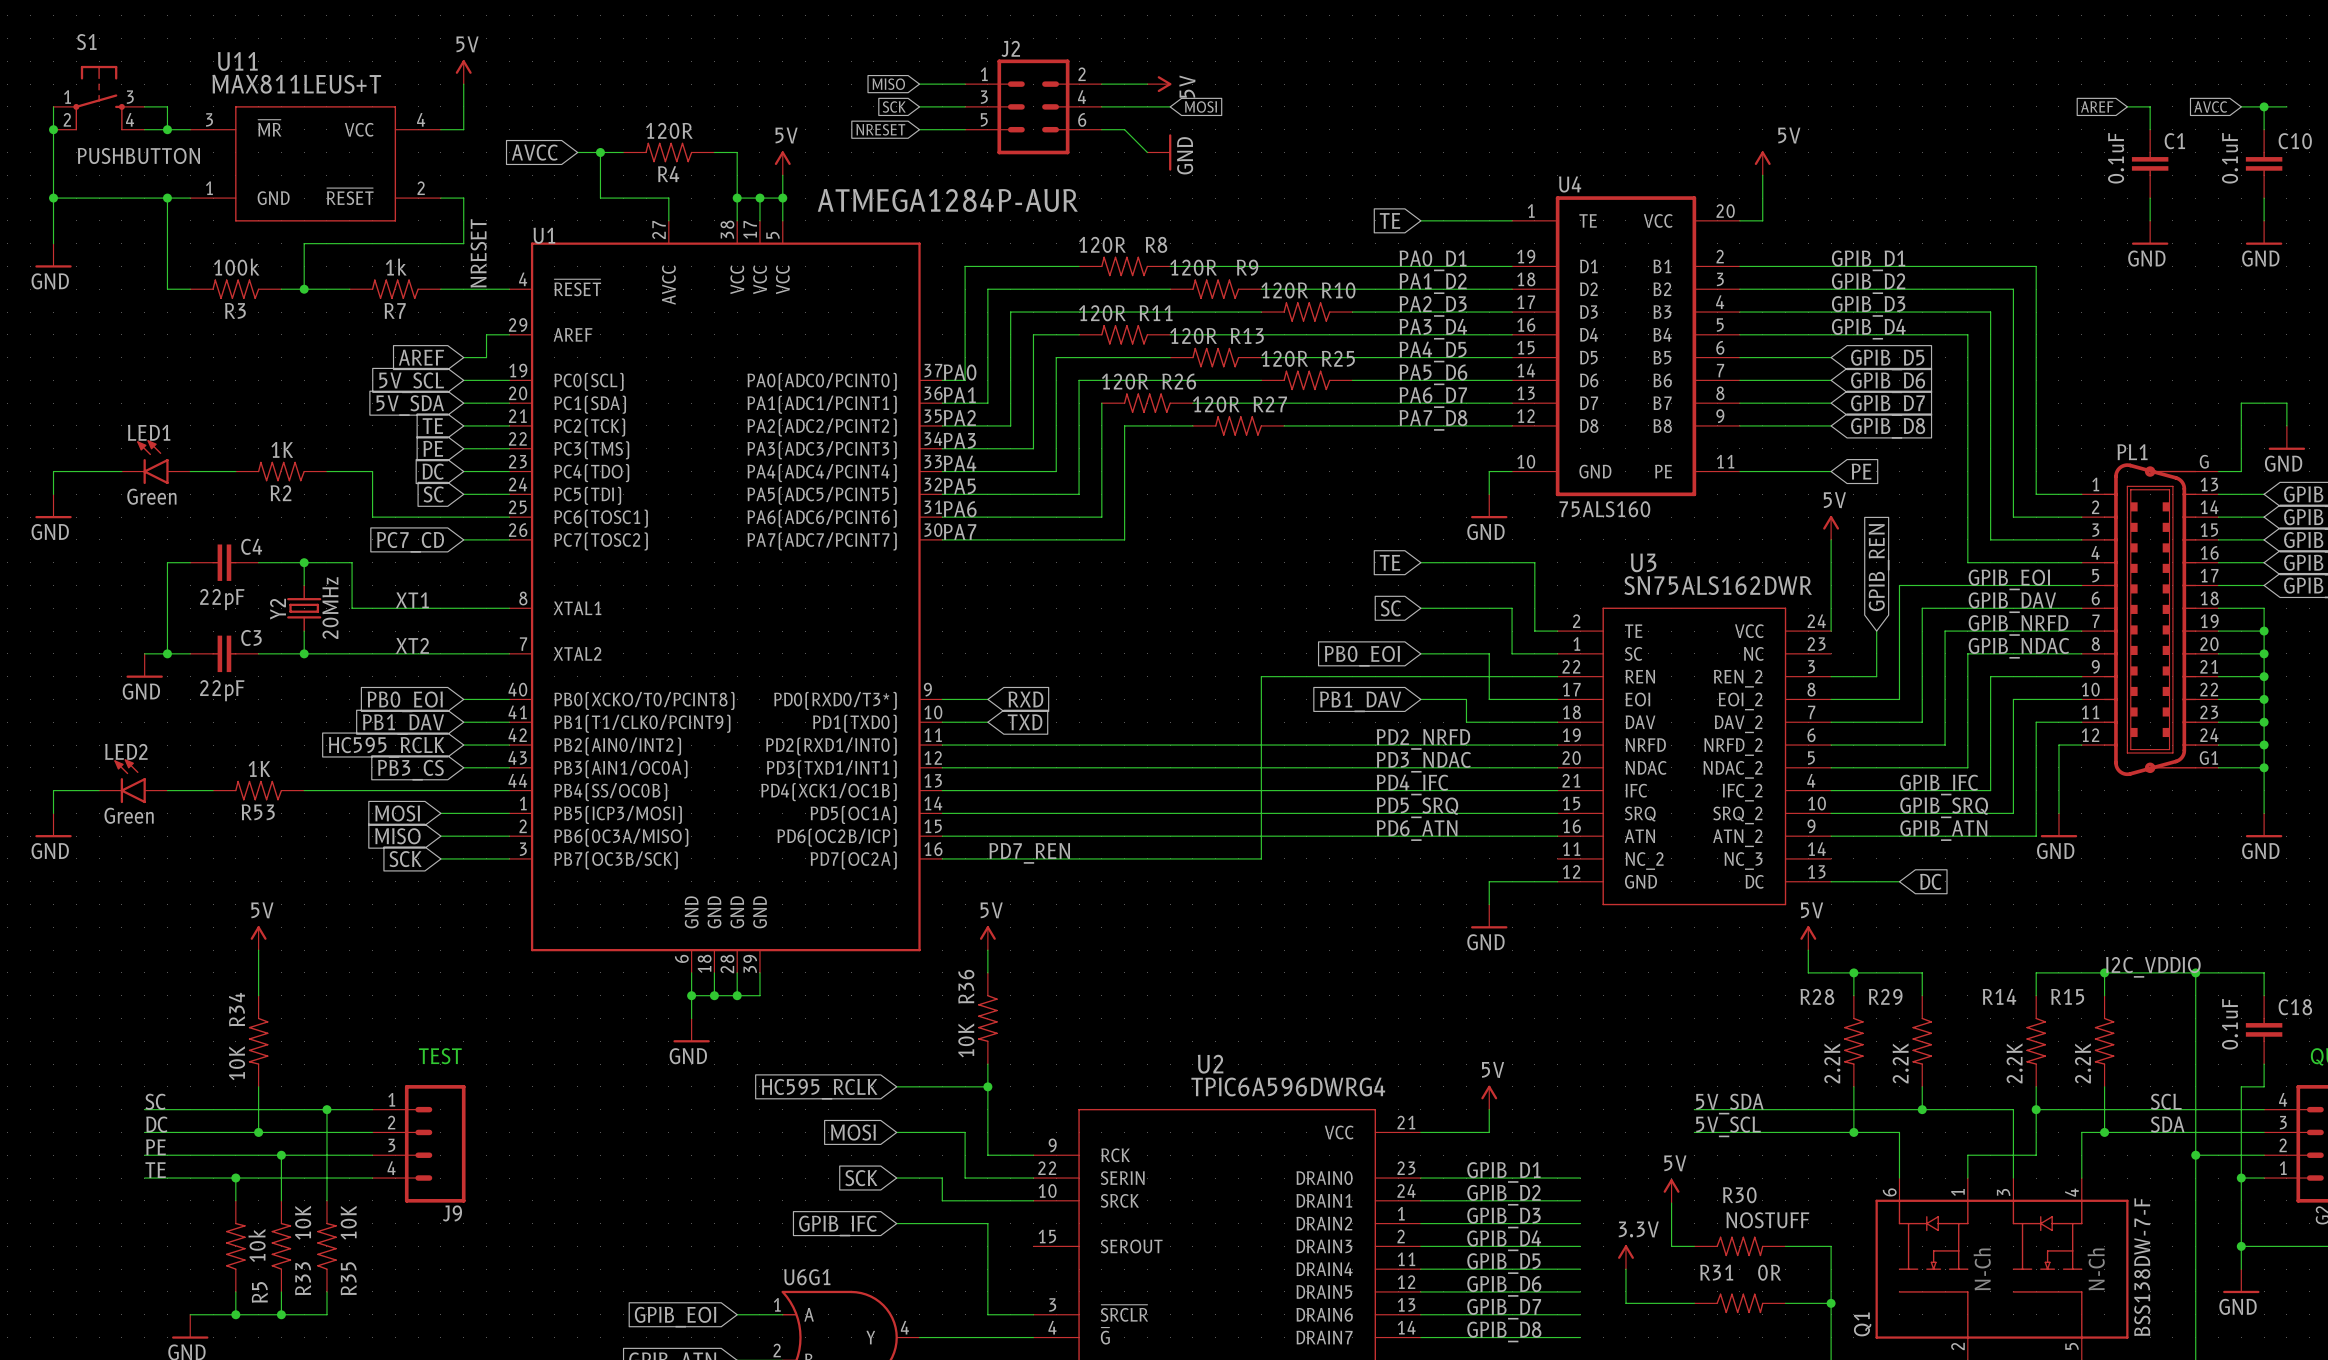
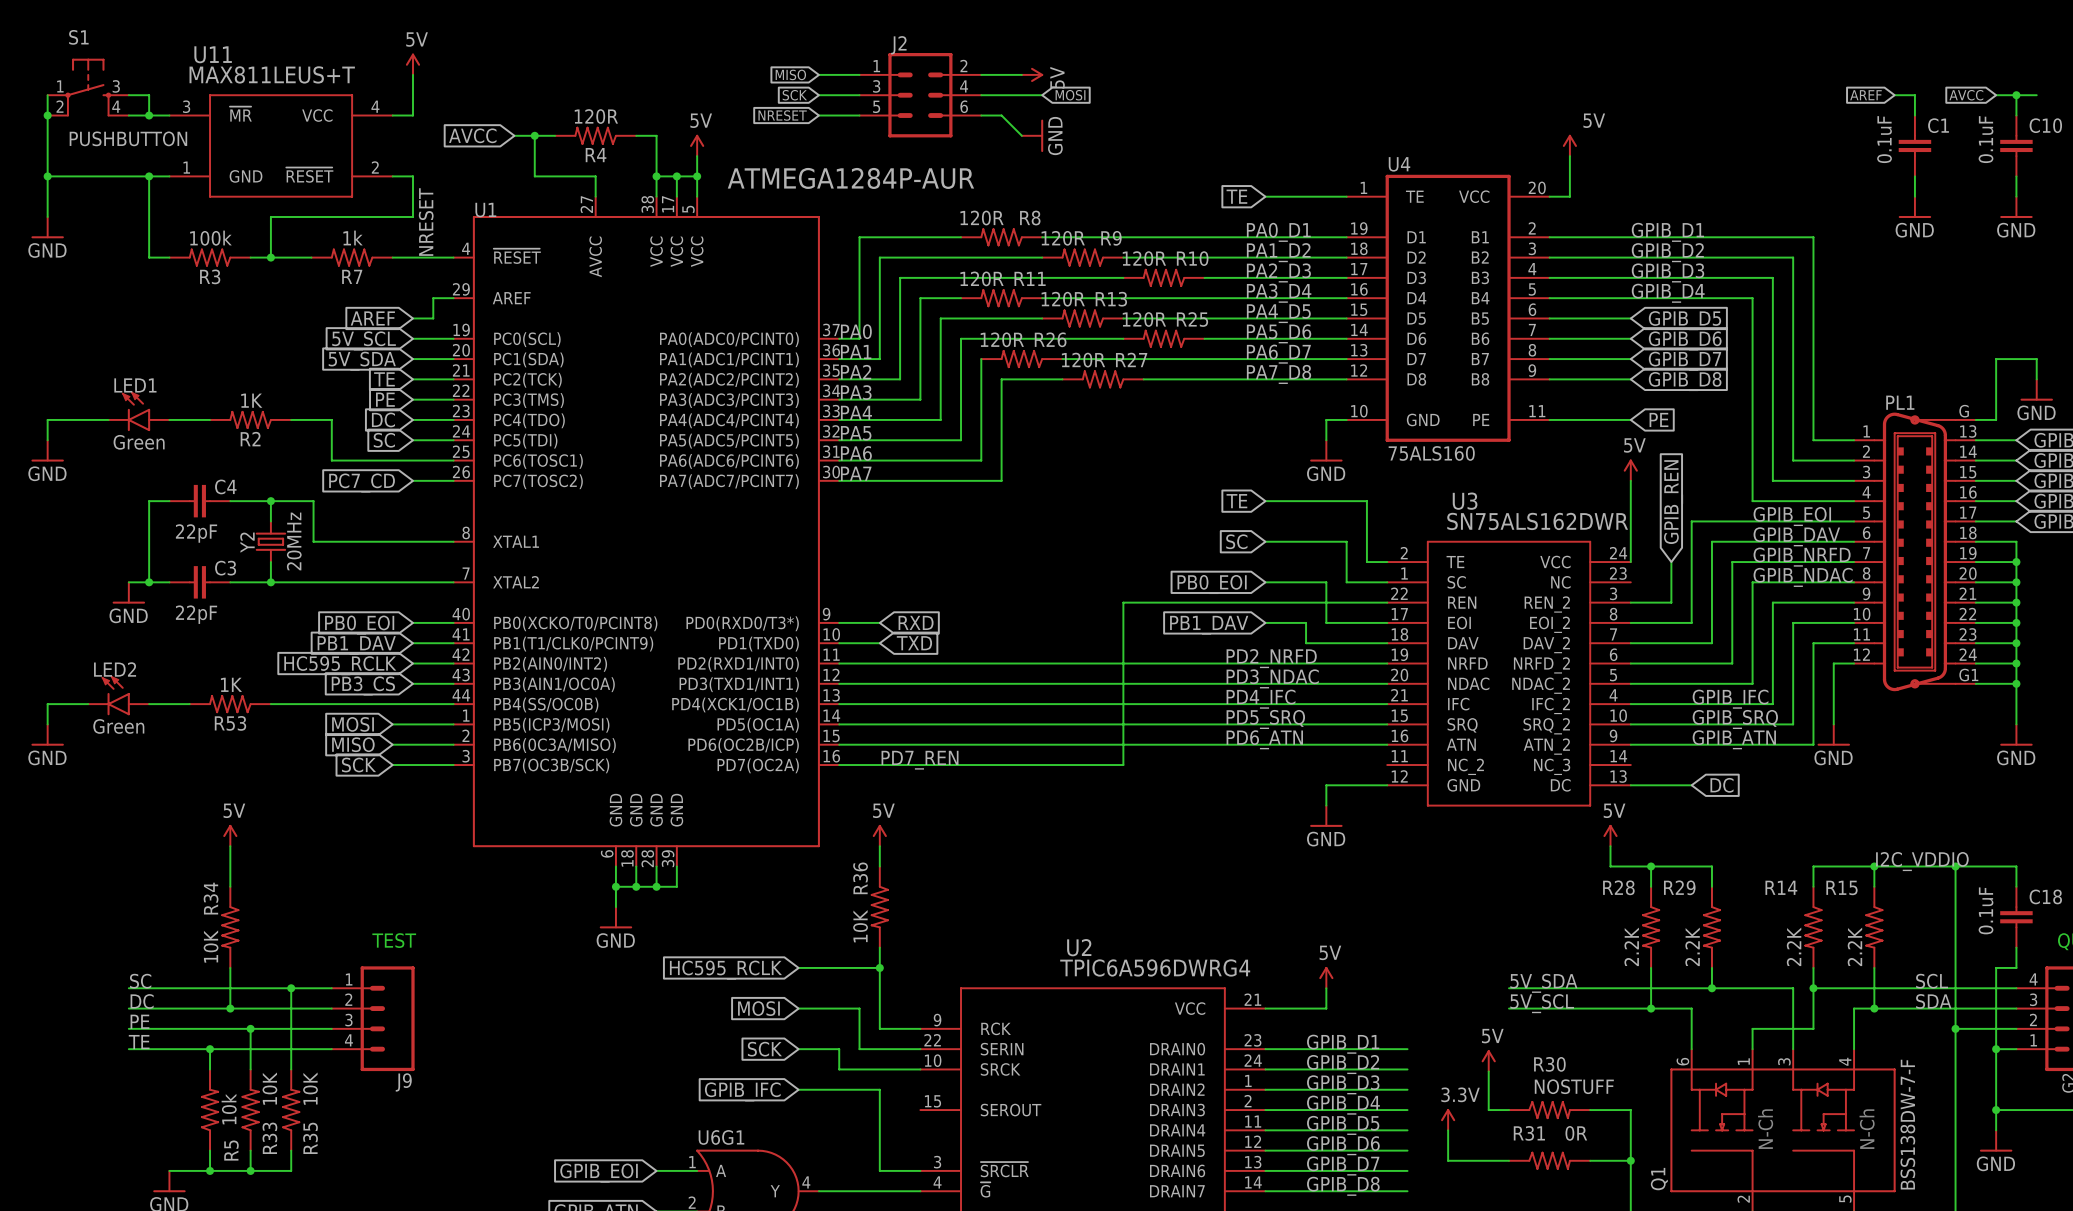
label: XT1 (412, 600) -> none
label: XT2 (412, 645) -> none

